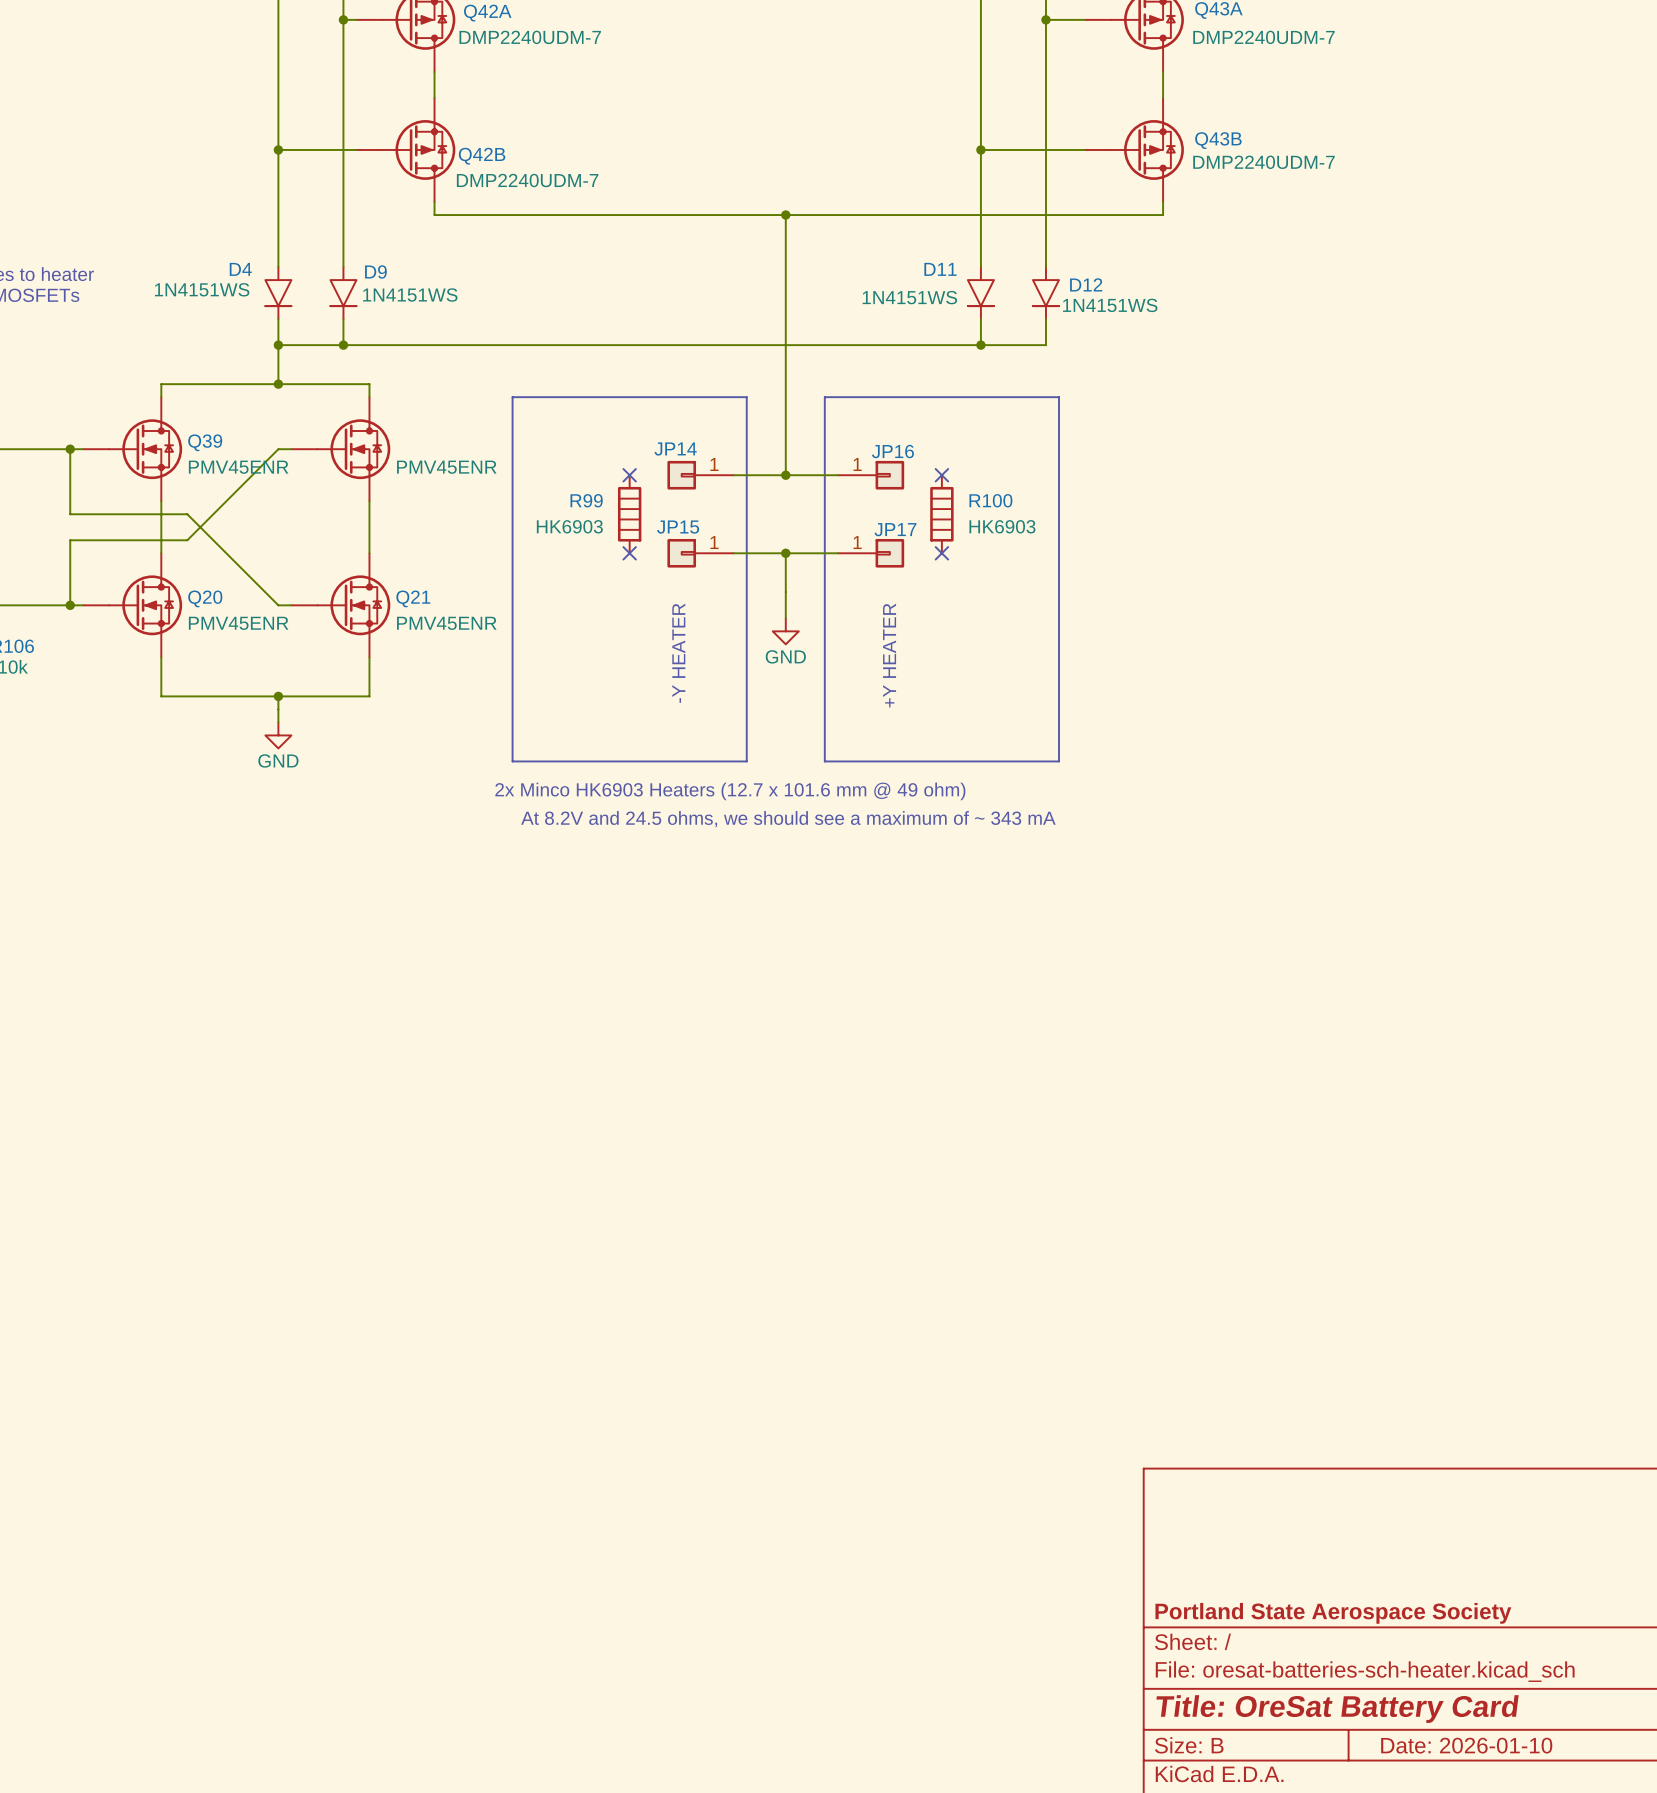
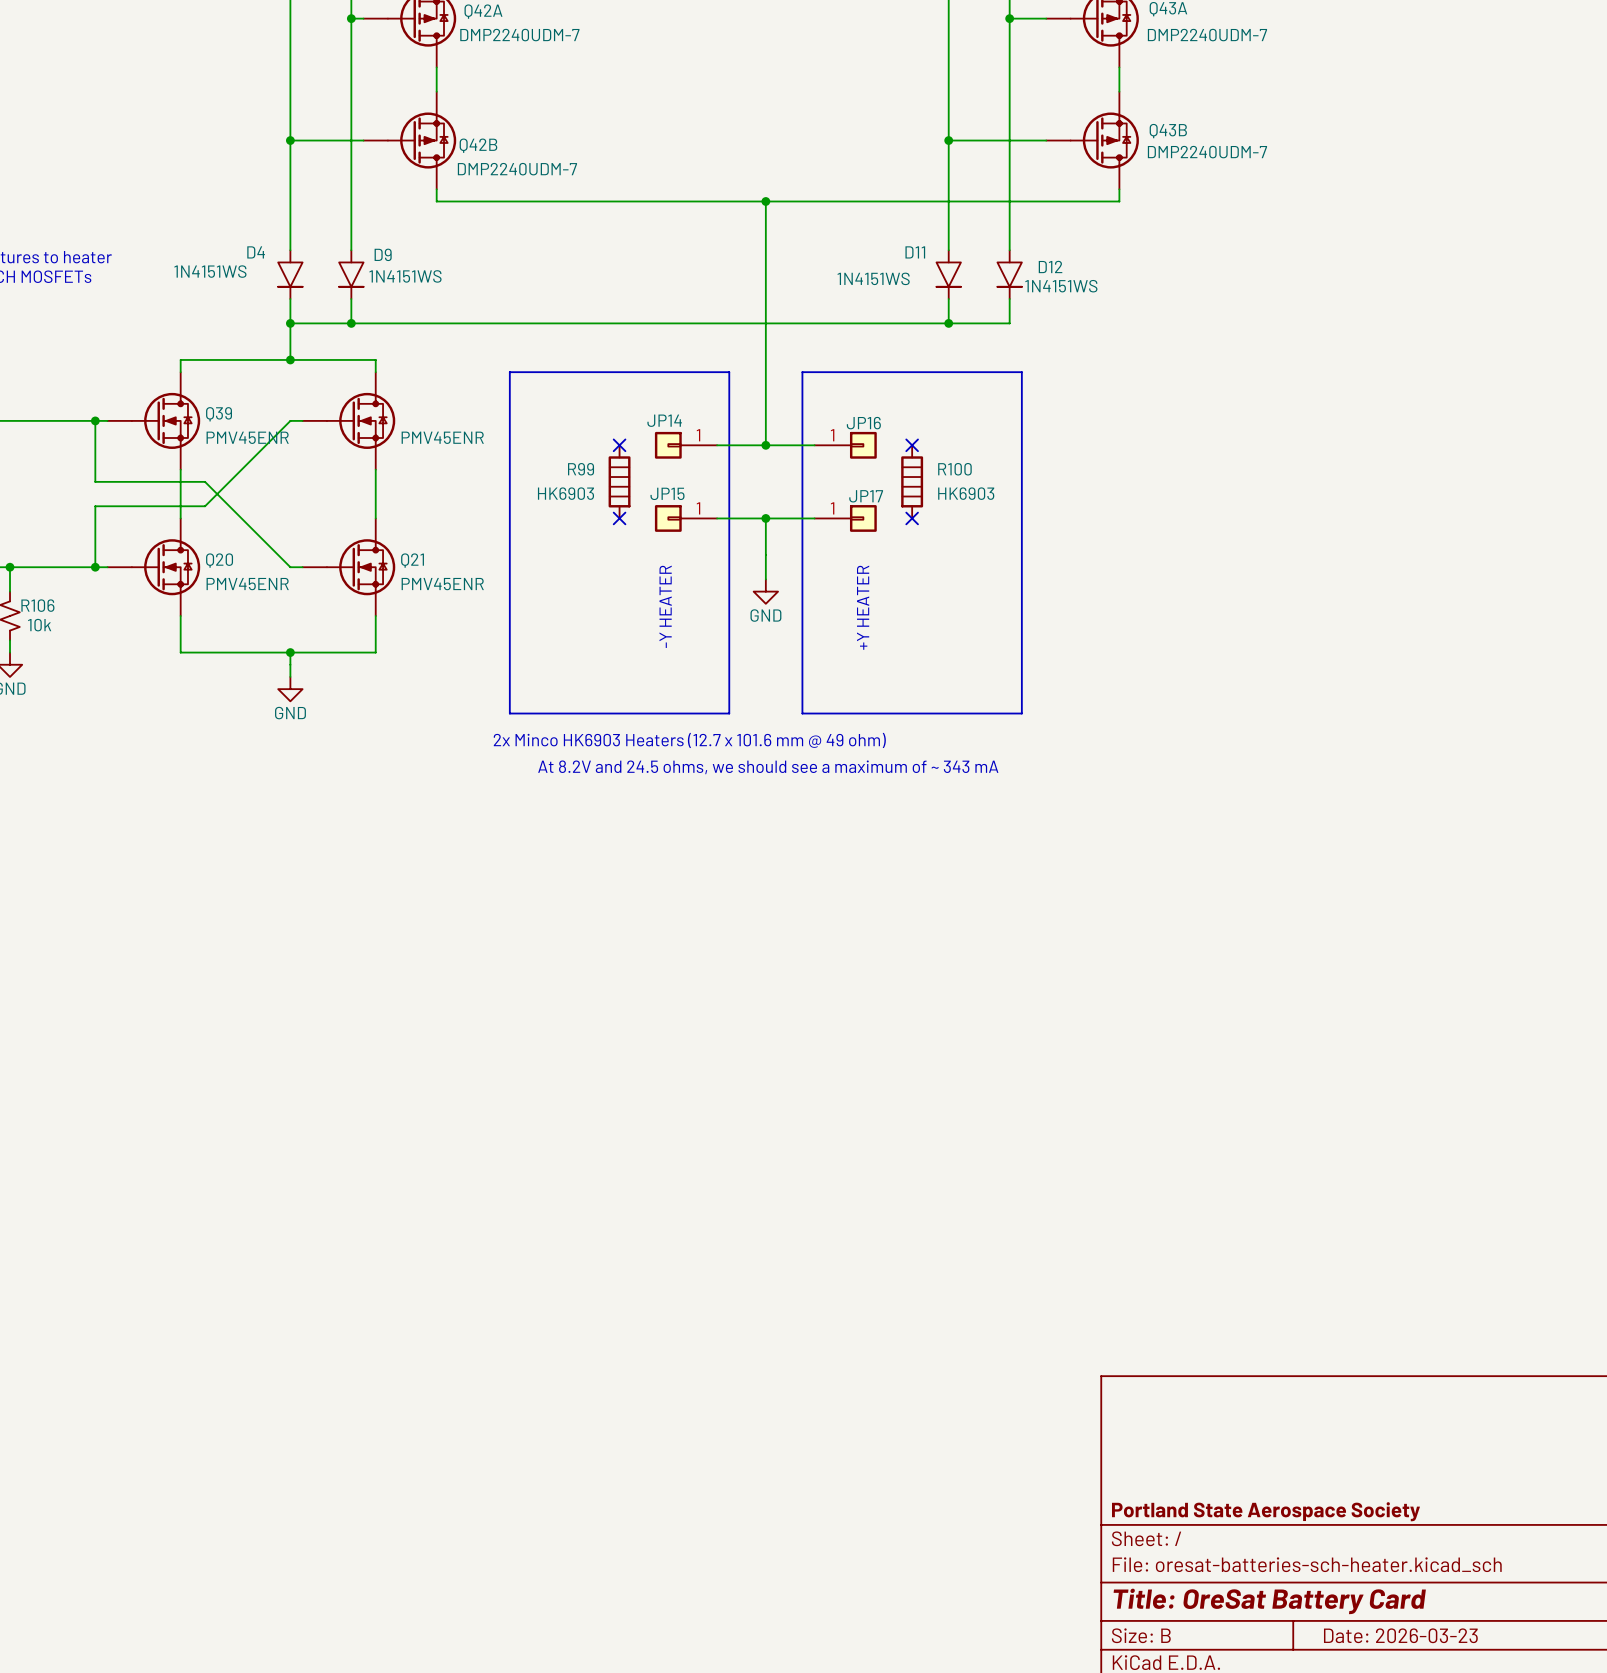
title block: Date: 2026-01-10 (1466, 1745) -> Date: 2026-03-23 (1400, 1635)

